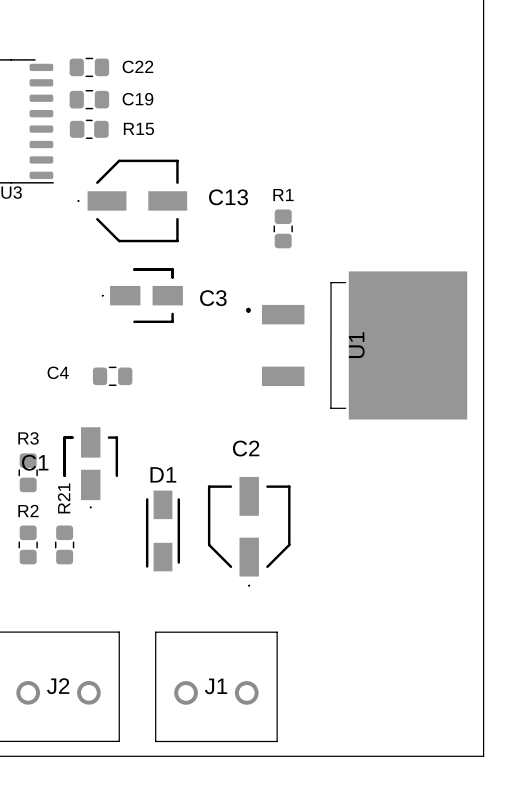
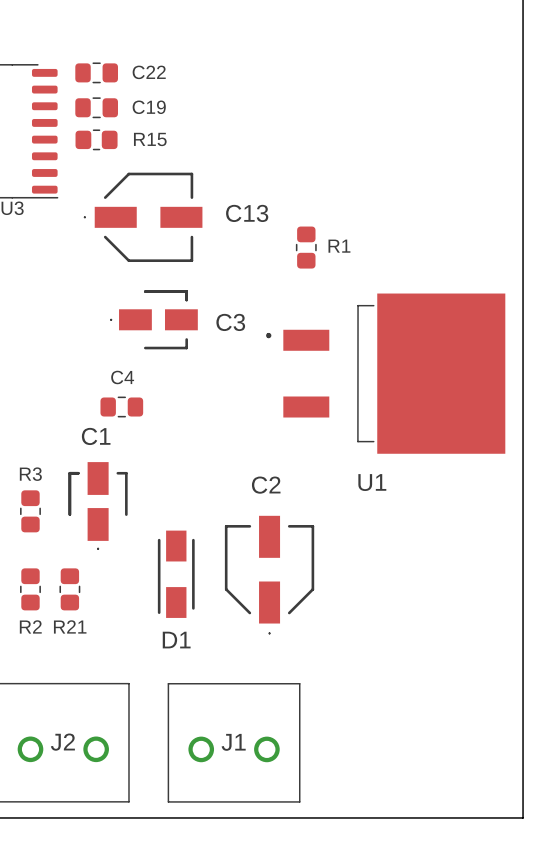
R1 name position: R1 (283, 195) -> R1 (339, 246)
U1 name rotation: 0° (356, 345) -> 90° clockwise (372, 482)
U1 name position: U1 (356, 345) -> U1 (372, 482)
C4 name position: C4 (58, 372) -> C4 (122, 377)
C1 name position: C1 (35, 462) -> C1 (96, 436)
D1 name position: D1 (163, 474) -> D1 (176, 640)
R21 name rotation: 0° (64, 498) -> 90° clockwise (70, 626)
R21 name position: R21 (64, 498) -> R21 (70, 626)
R2 name position: R2 (28, 510) -> R2 (30, 626)

